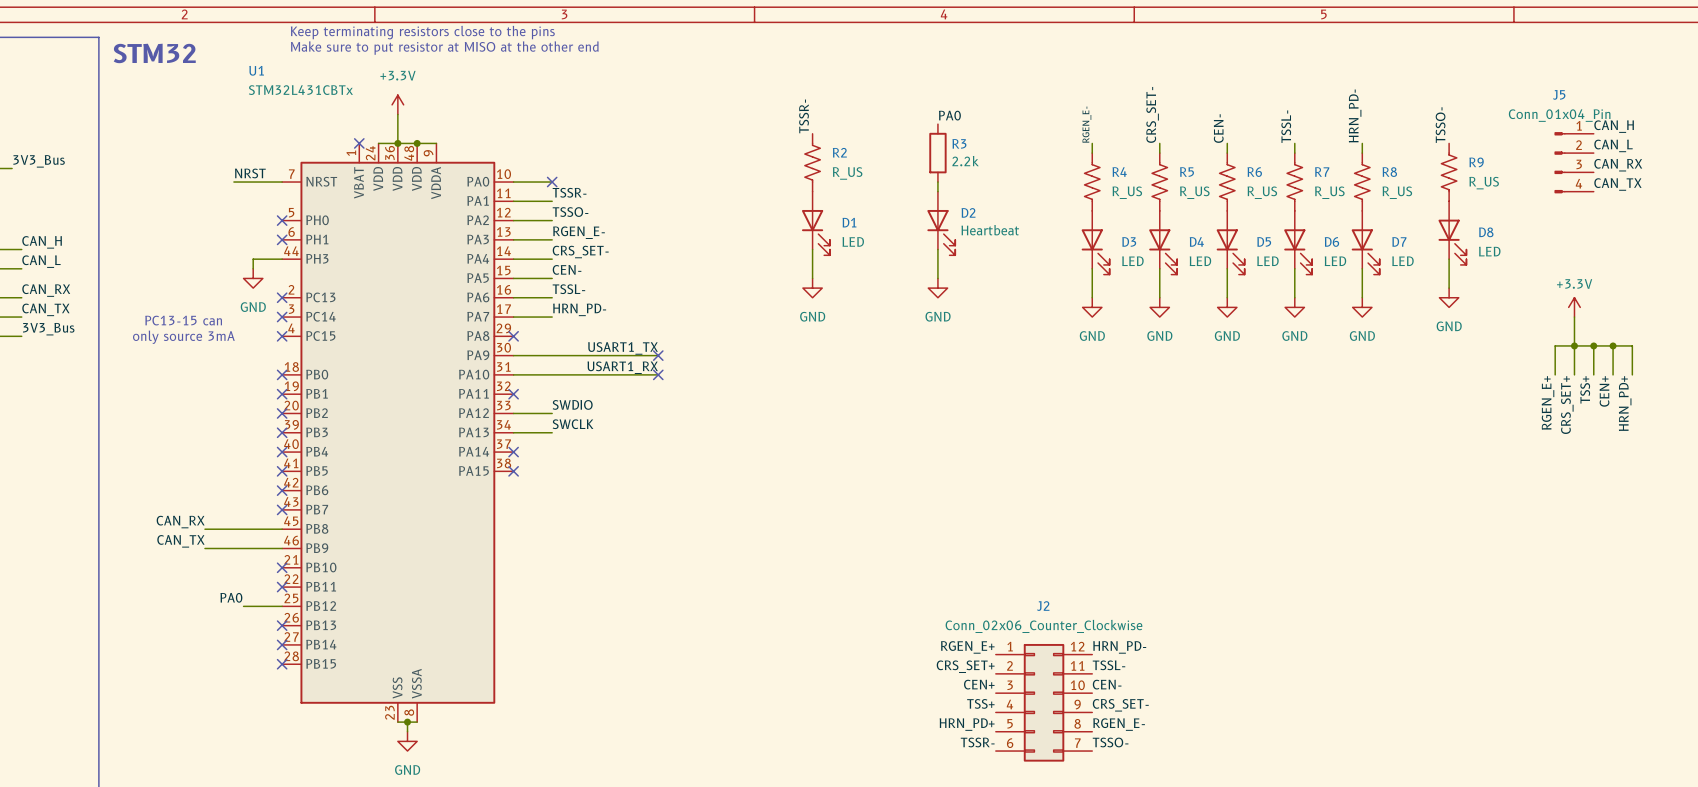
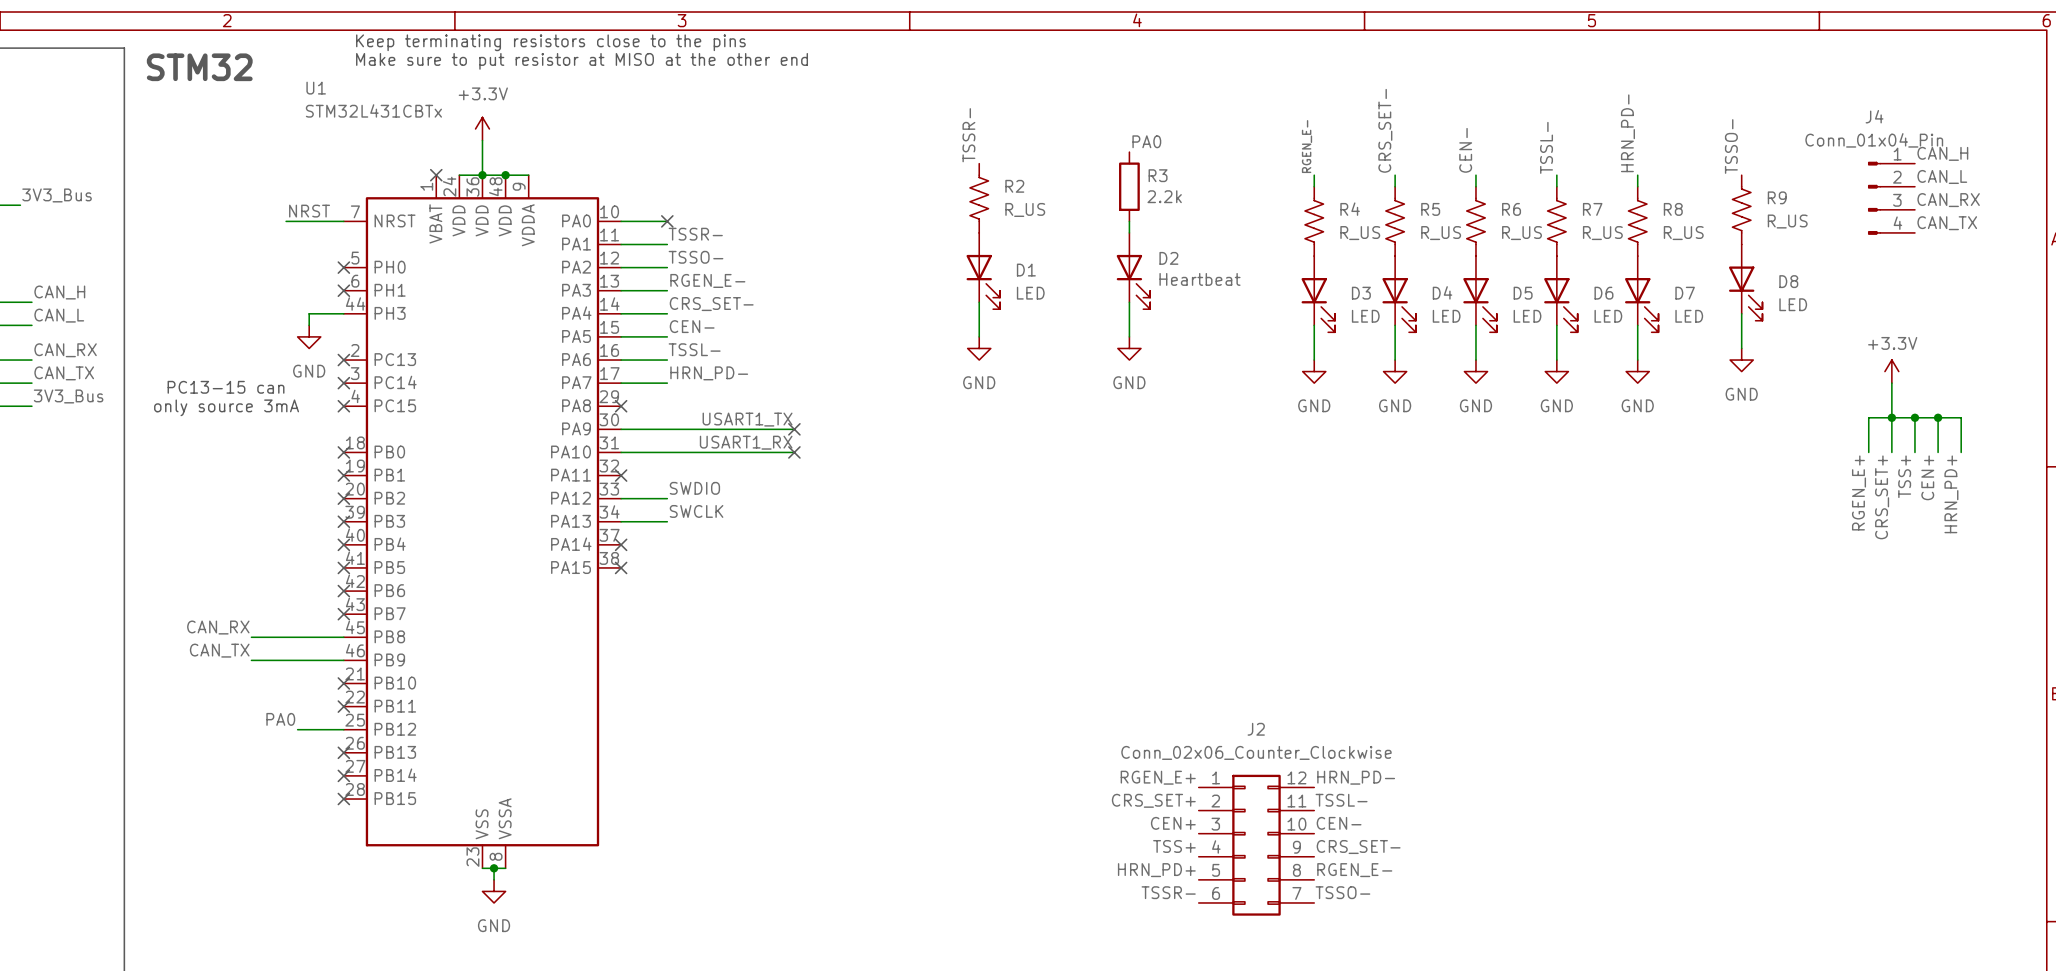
J5 name: J5 (1559, 94) -> J4 (1874, 116)

